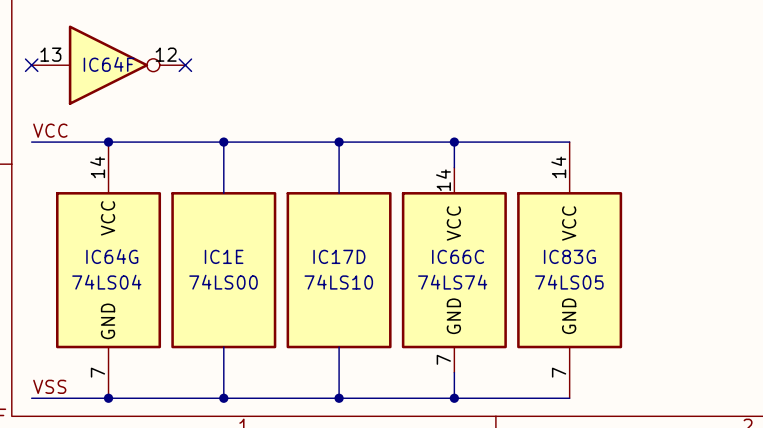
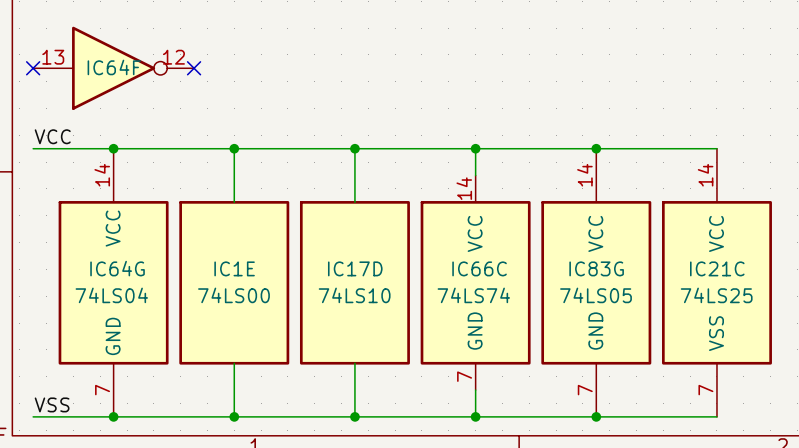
wire: none -> (596, 148) (716, 148)
junction: none -> (596, 148)
IC21C: none -> 74LS25 (716, 282)
wire: none -> (596, 416) (716, 416)
junction: none -> (596, 416)

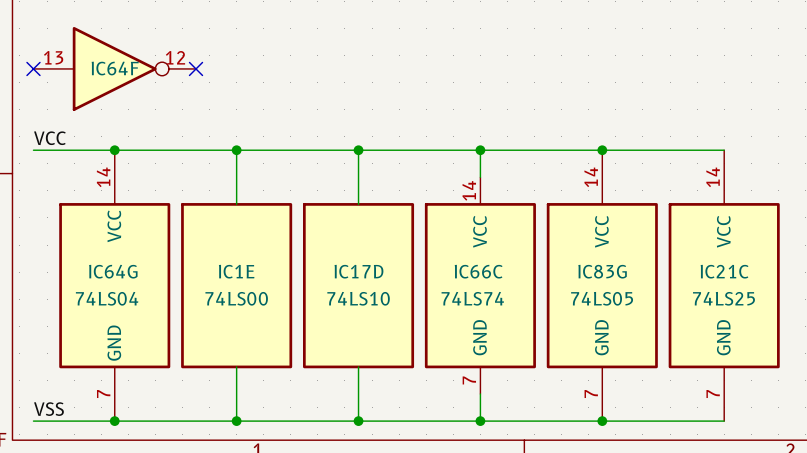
IC21C pin name: VSS (716, 333) -> GND (723, 337)

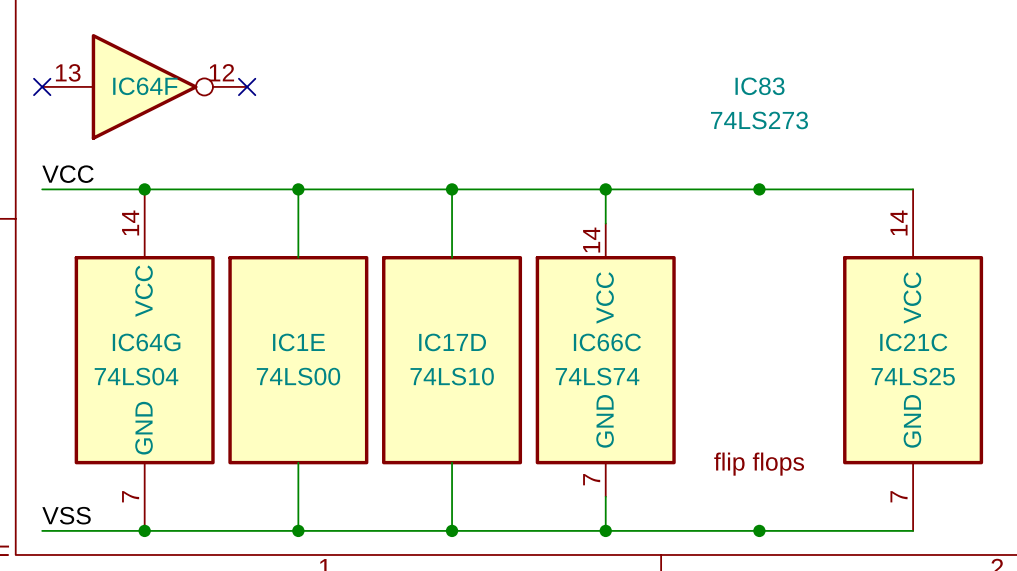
IC83: none -> 74LS273 (759, 276)
IC83G: 74LS05 (602, 285) -> none

